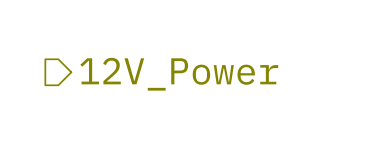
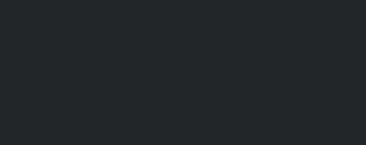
hierarchical label: 12V_Power (179, 74) -> none

